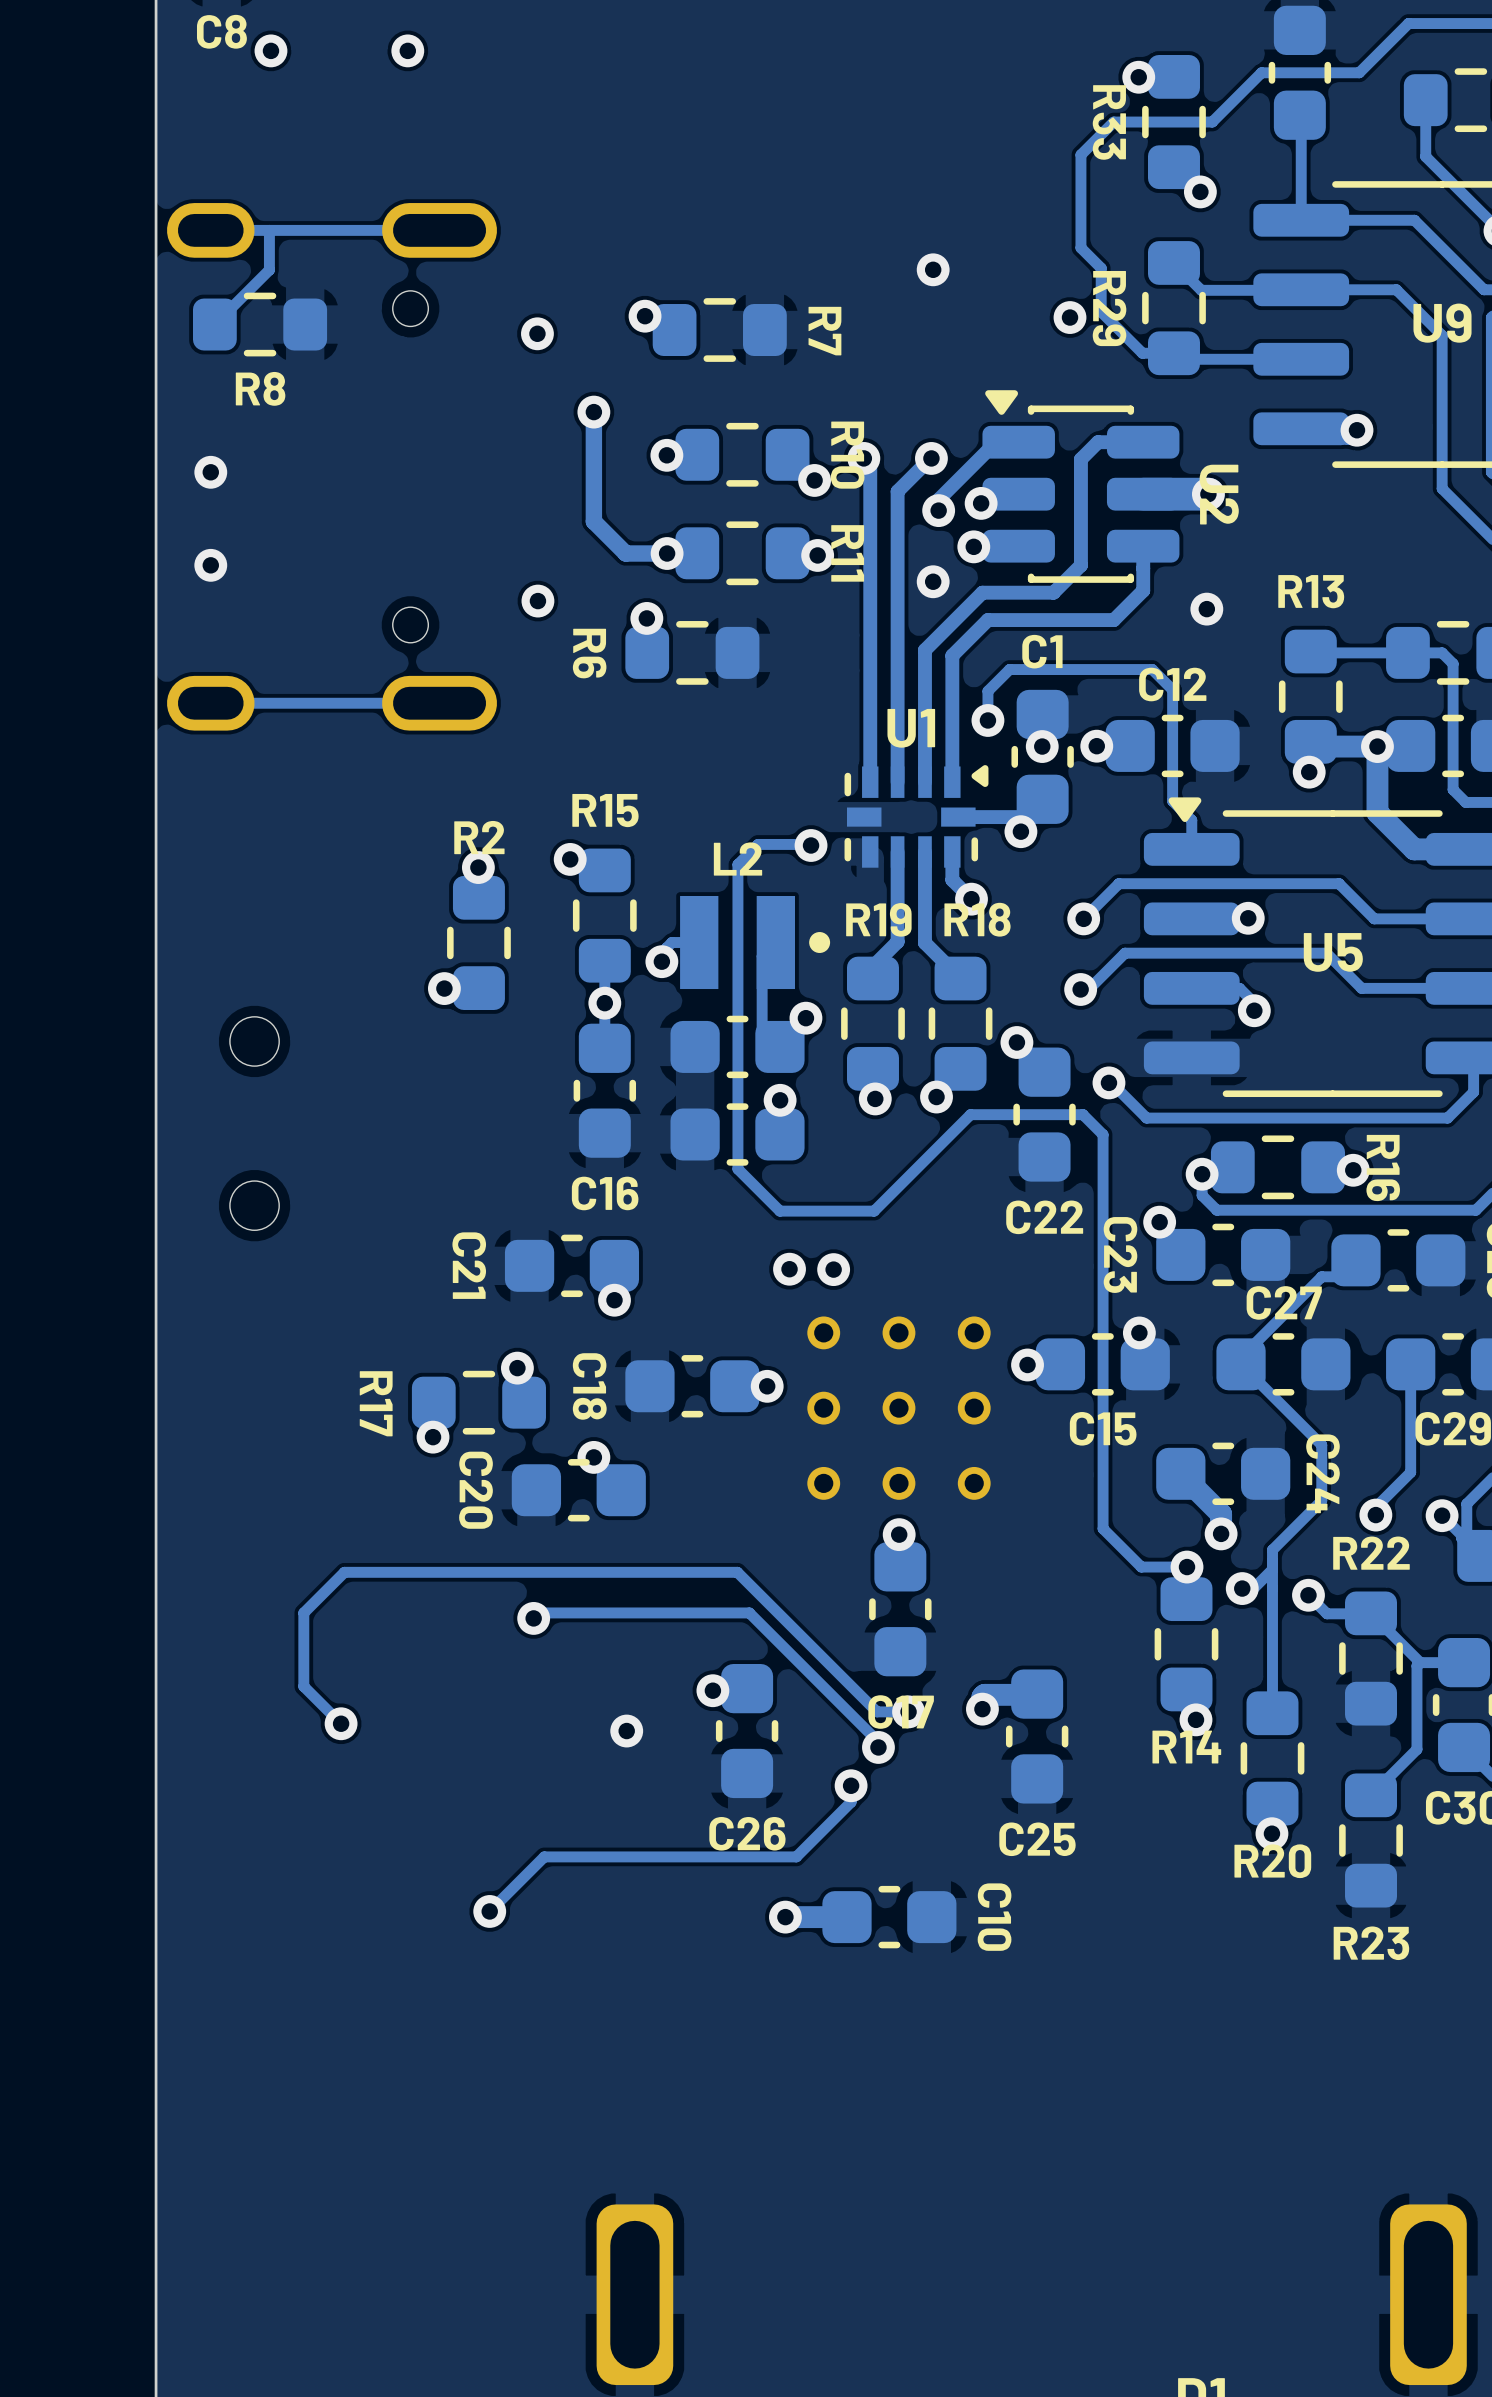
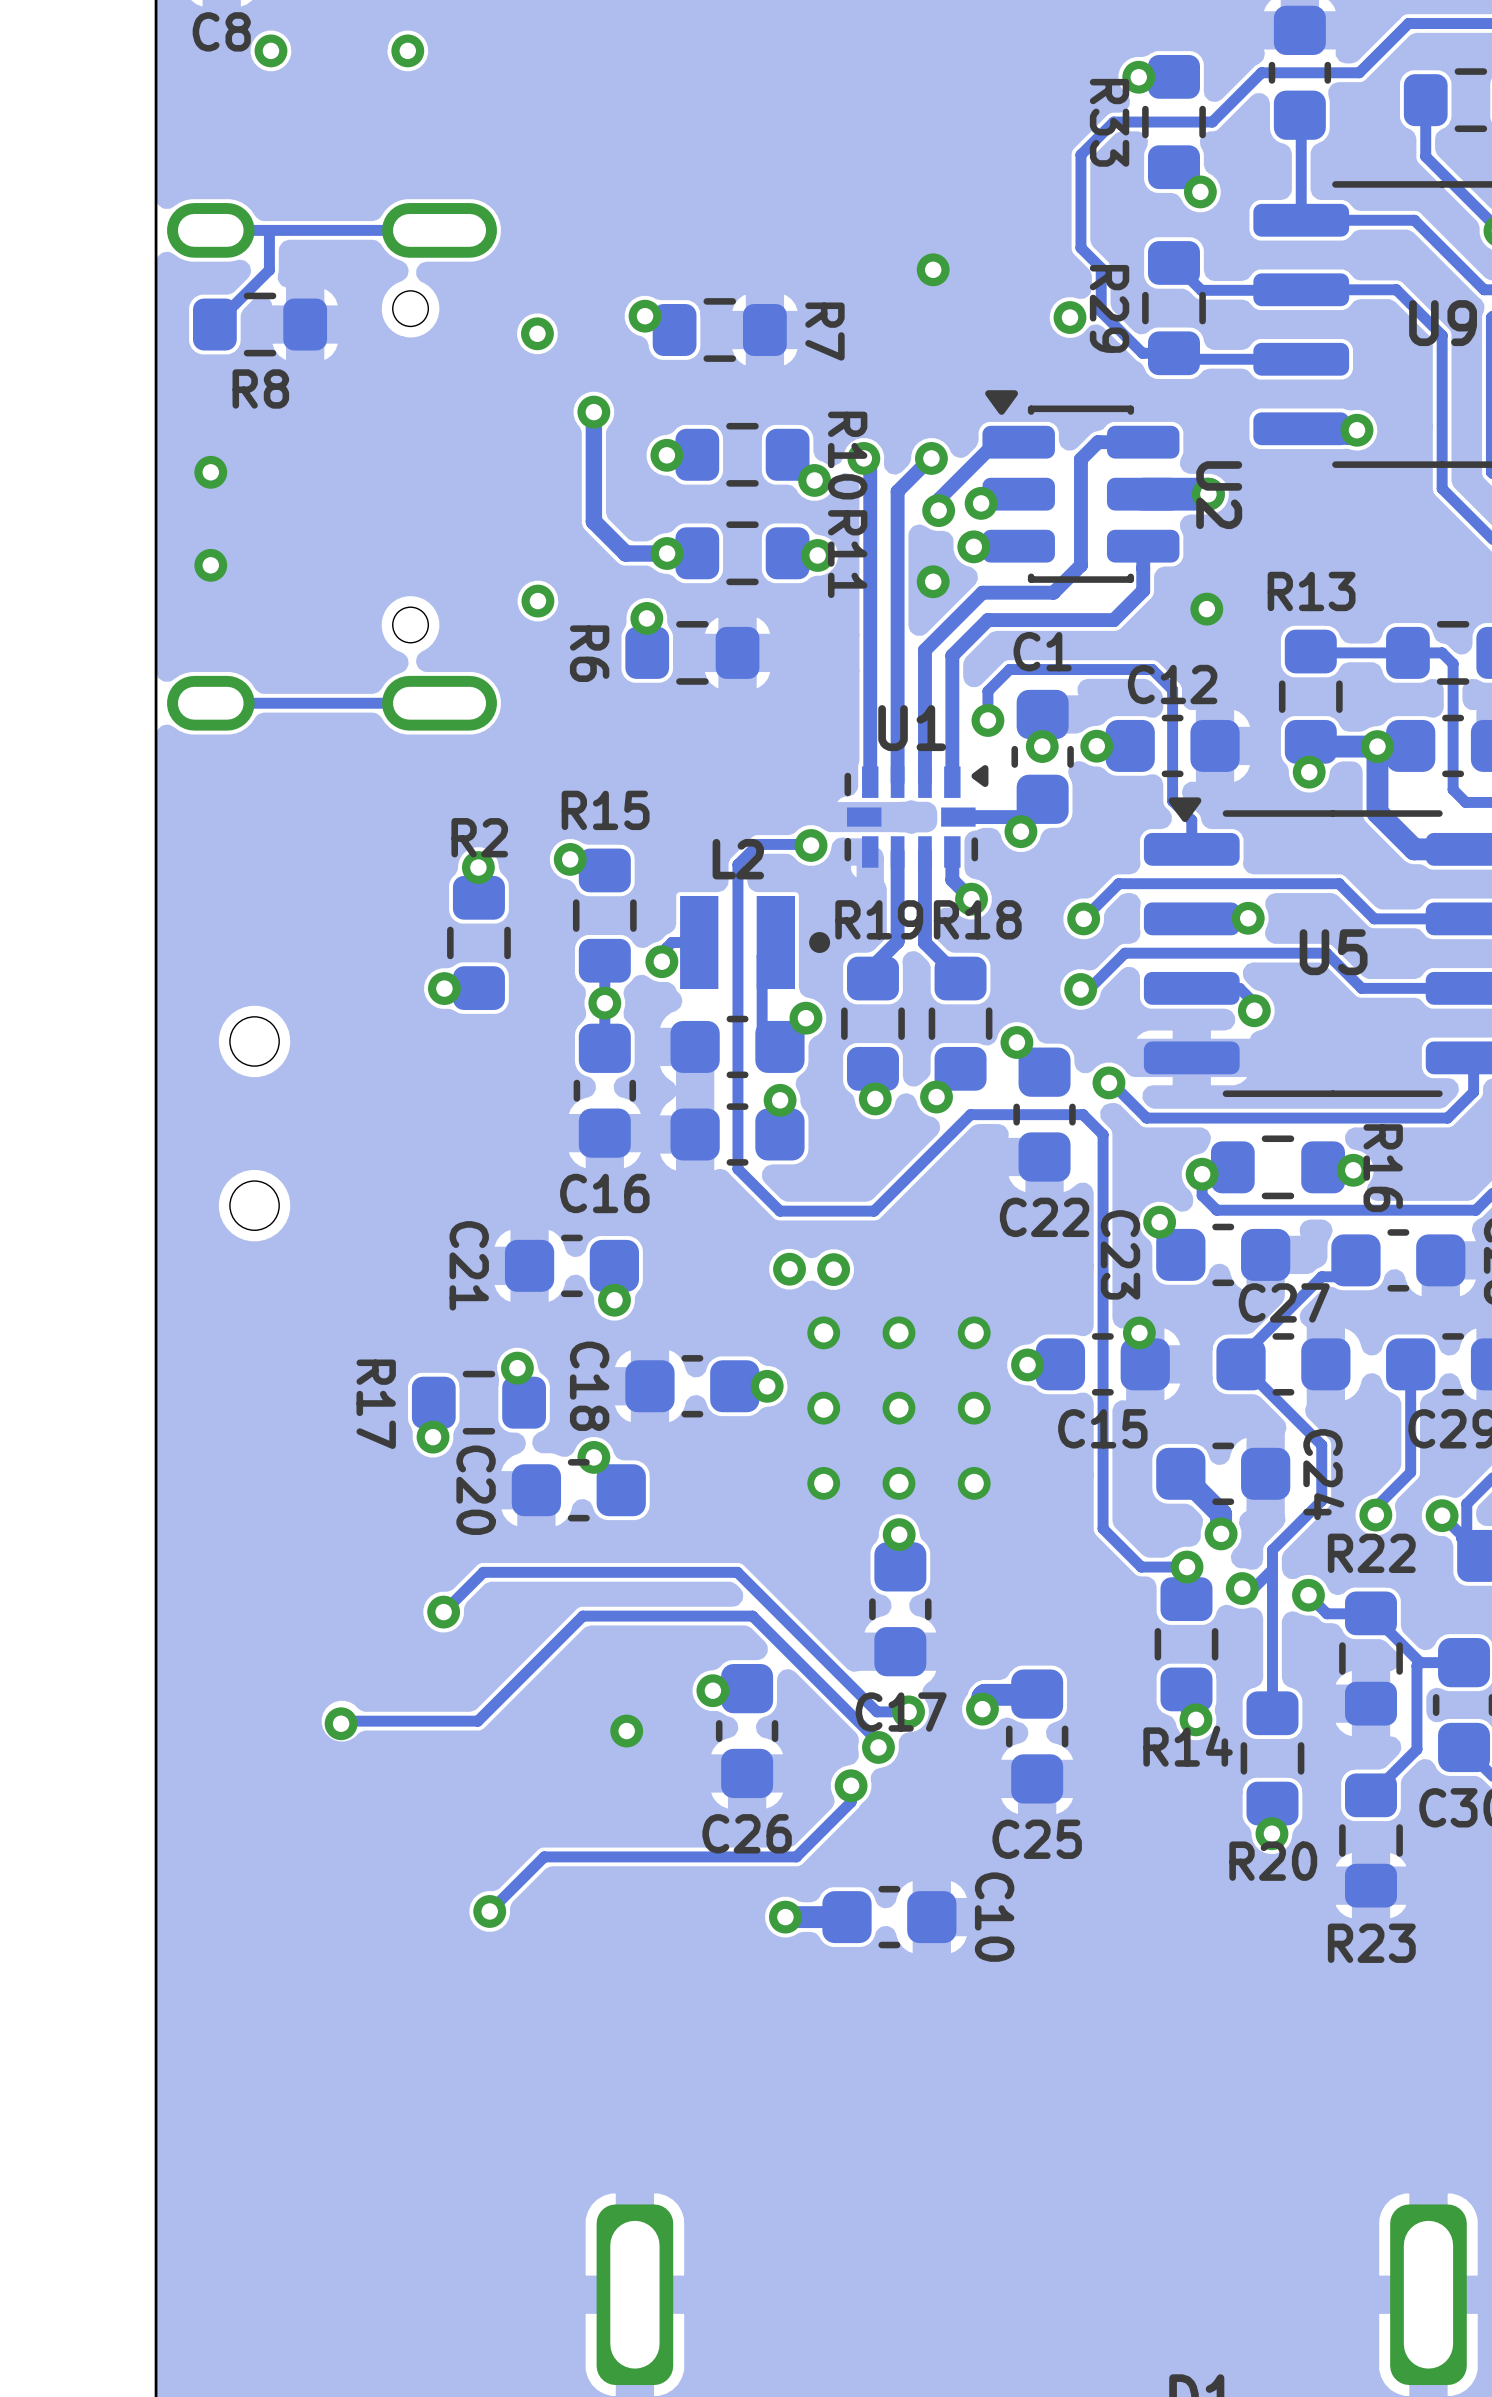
track: (483, 1572) (344, 1572) (303, 1612) (303, 1686) (341, 1723) -> (483, 1572) (443, 1612)
track: (752, 1616) (749, 1612) (539, 1612) (533, 1618) -> (752, 1616) (582, 1616) (477, 1721) (342, 1721)
via position: (533, 1618) -> (443, 1612)

